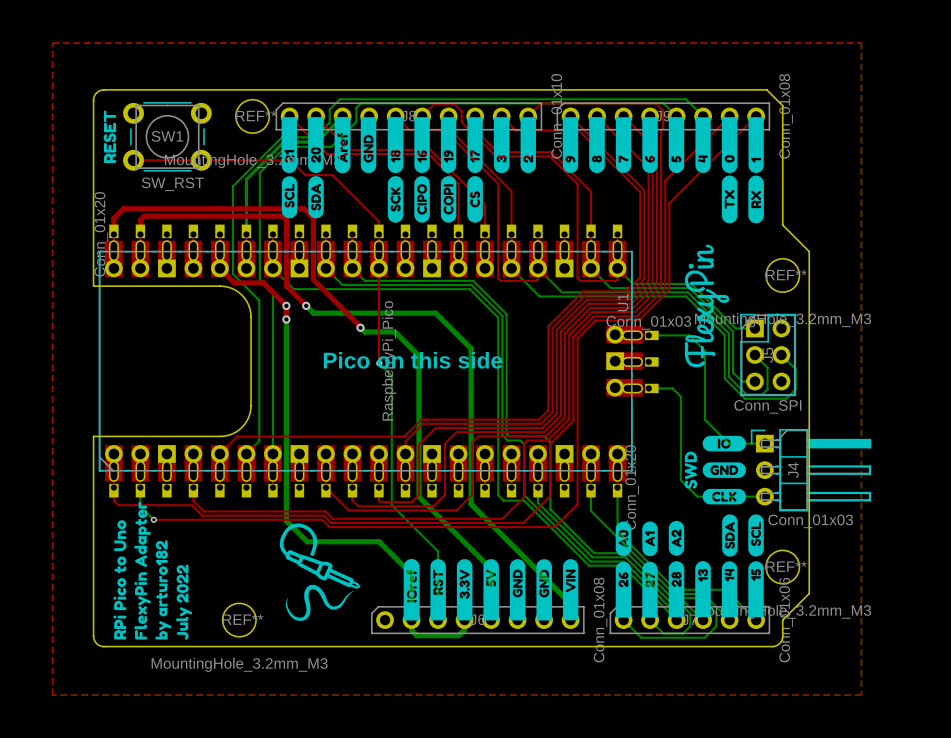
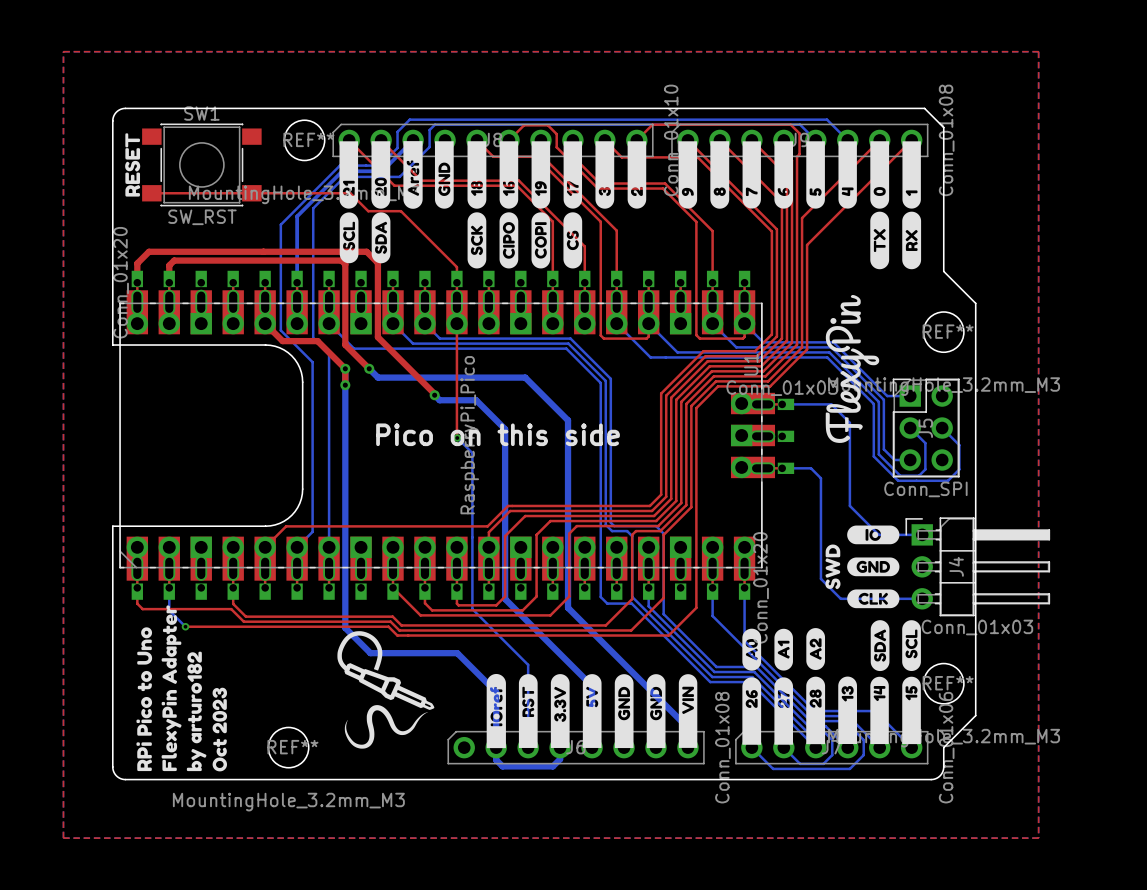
SW1 footprint: [123, 102, 212, 172] -> [142, 123, 262, 207]
SW1 name position: SW1 (167, 136) -> SW1 (201, 113)
drawing shape: [113, 502, 193, 640] -> [136, 605, 228, 772]

